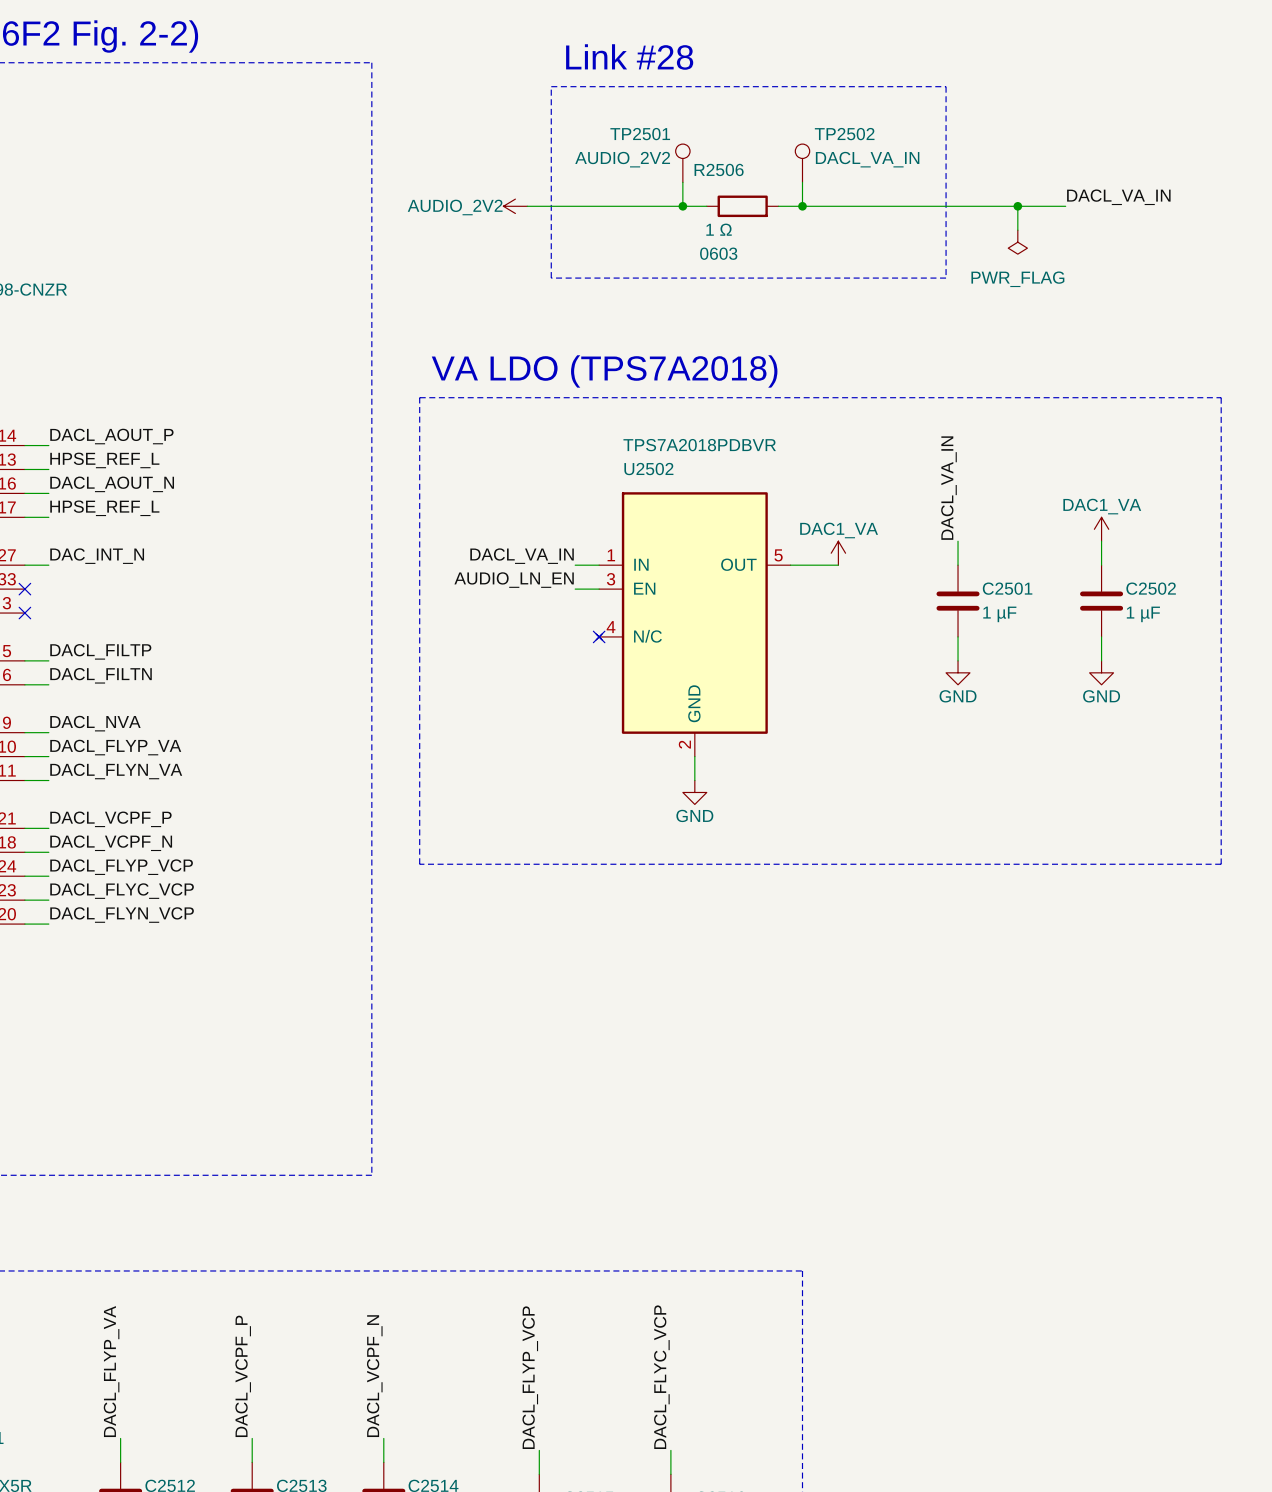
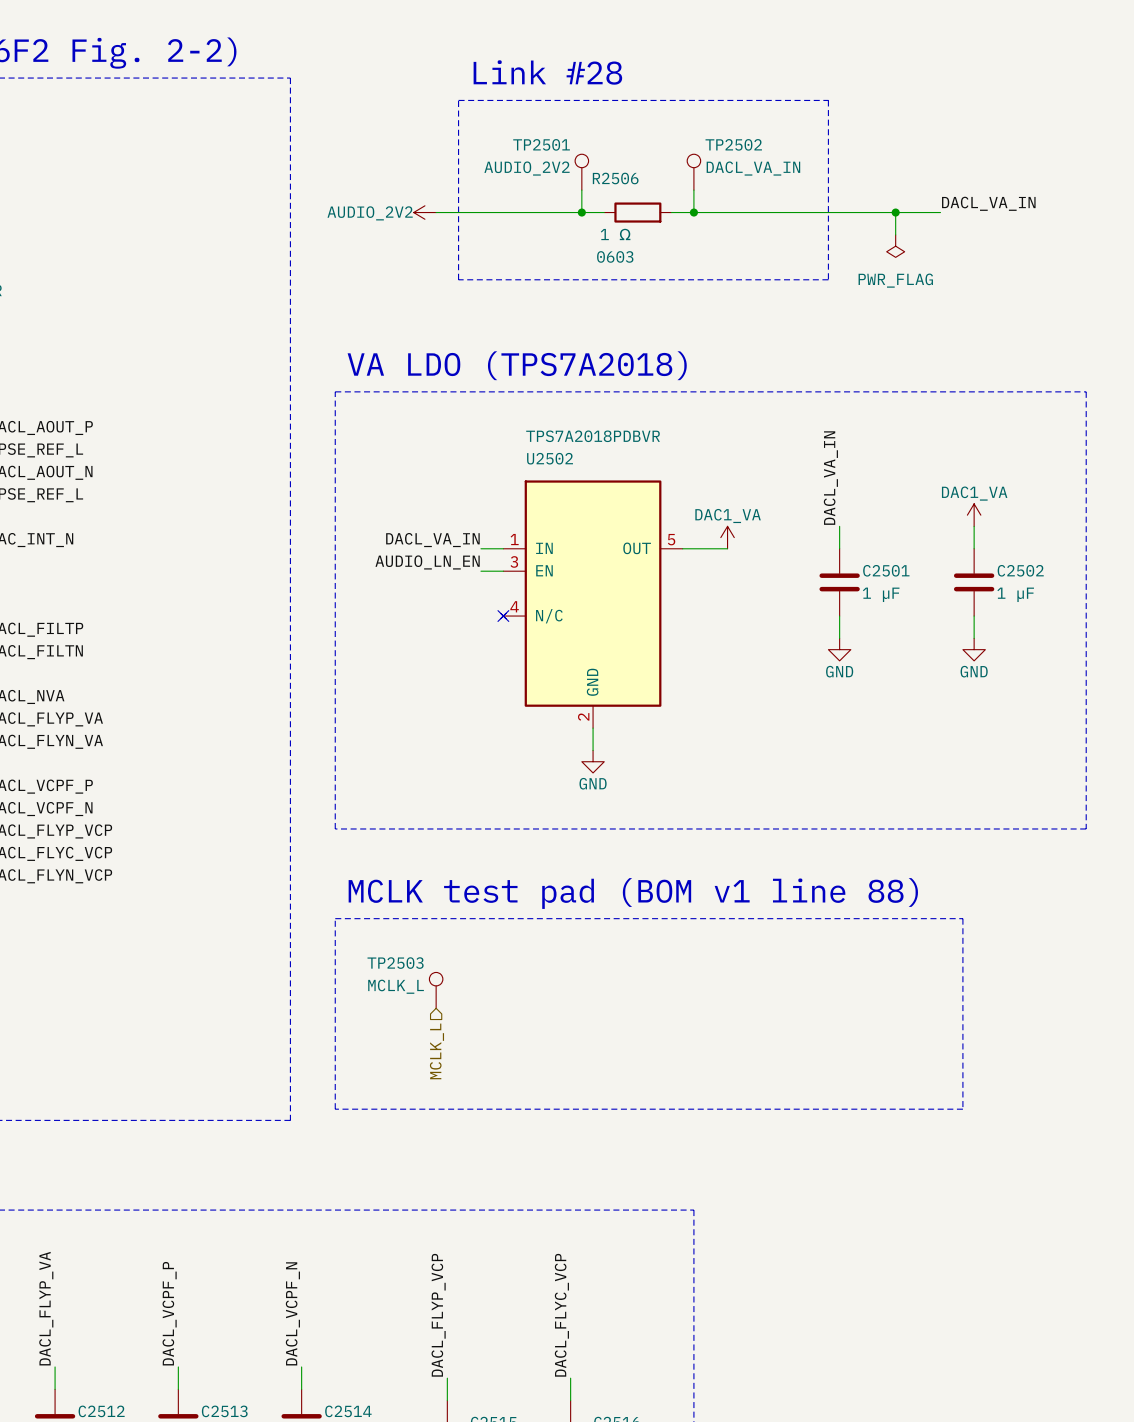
text: none -> MCLK test pad (BOM v1 line 88) (633, 893)
line: none -> (335, 918) (962, 918) (962, 1109) (335, 1109) (335, 918)
TP2503: none -> MCLK_L (436, 990)
hierarchical label: none -> MCLK_L (436, 1051)

